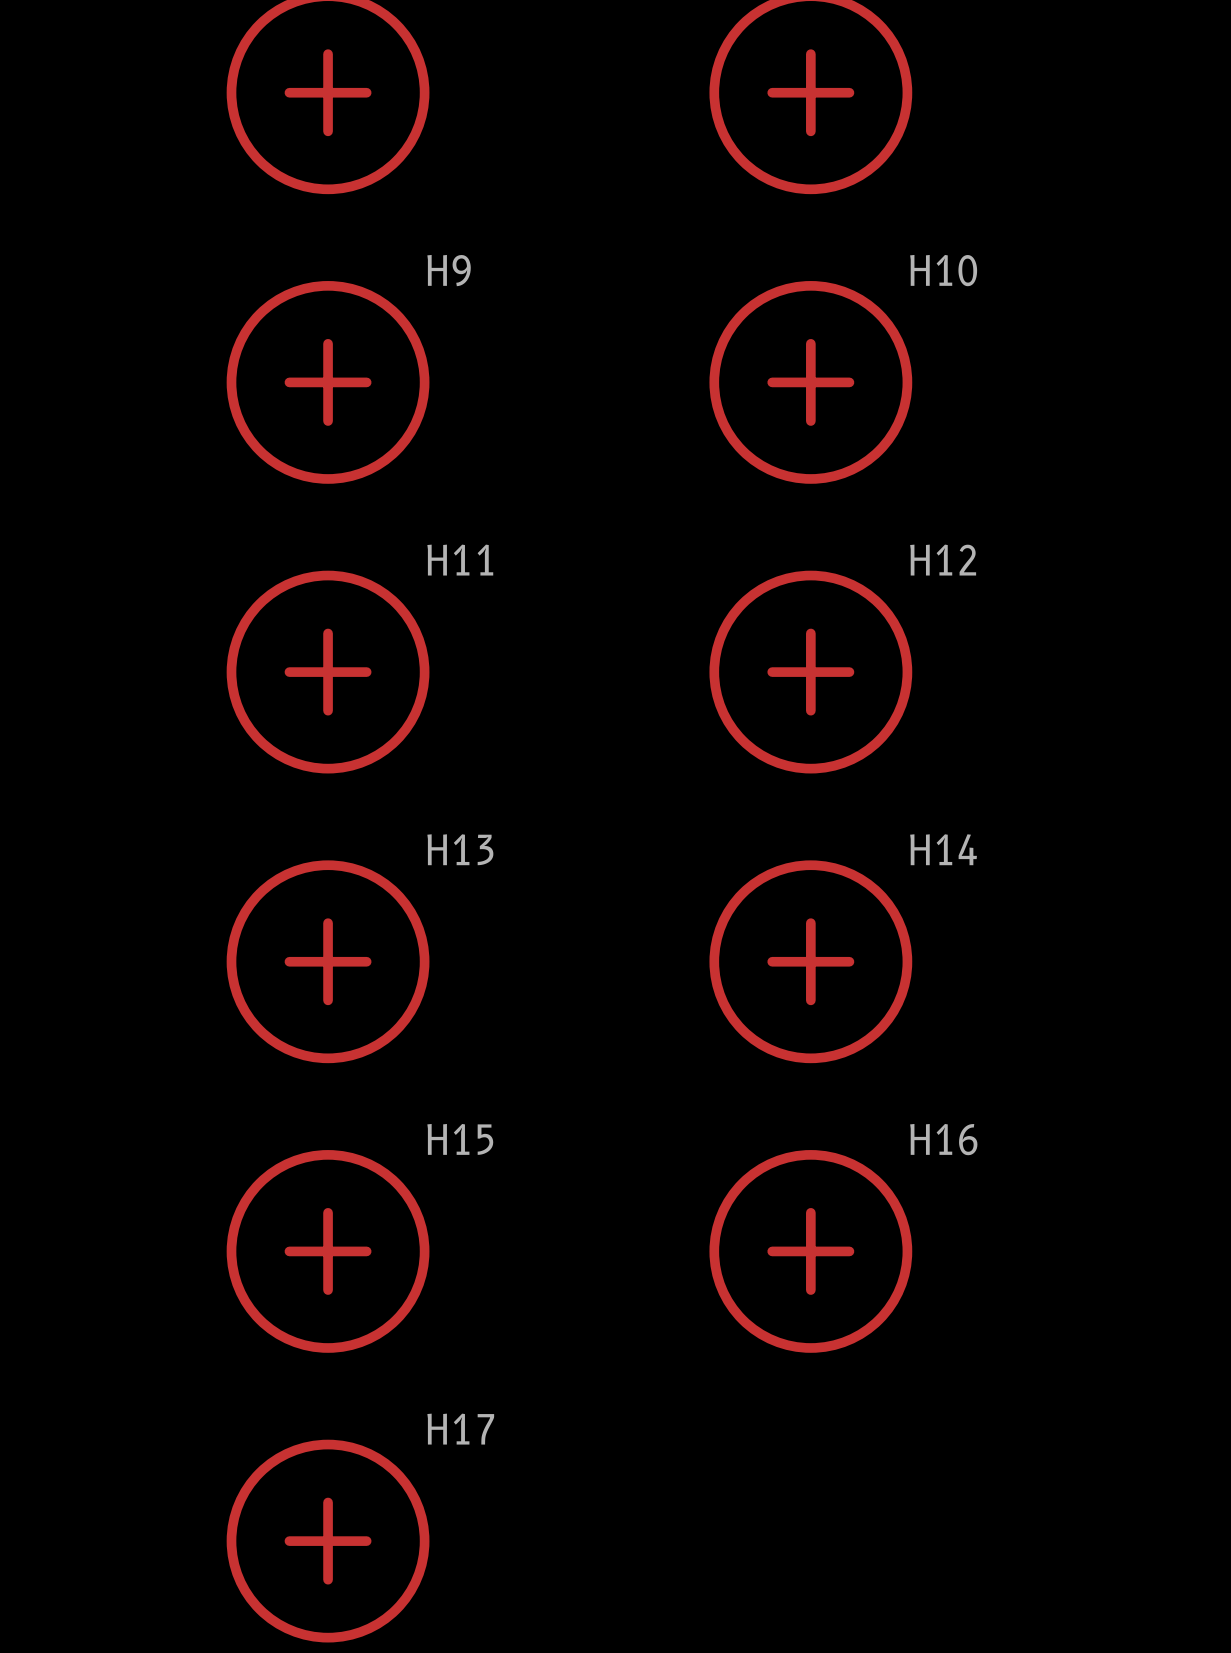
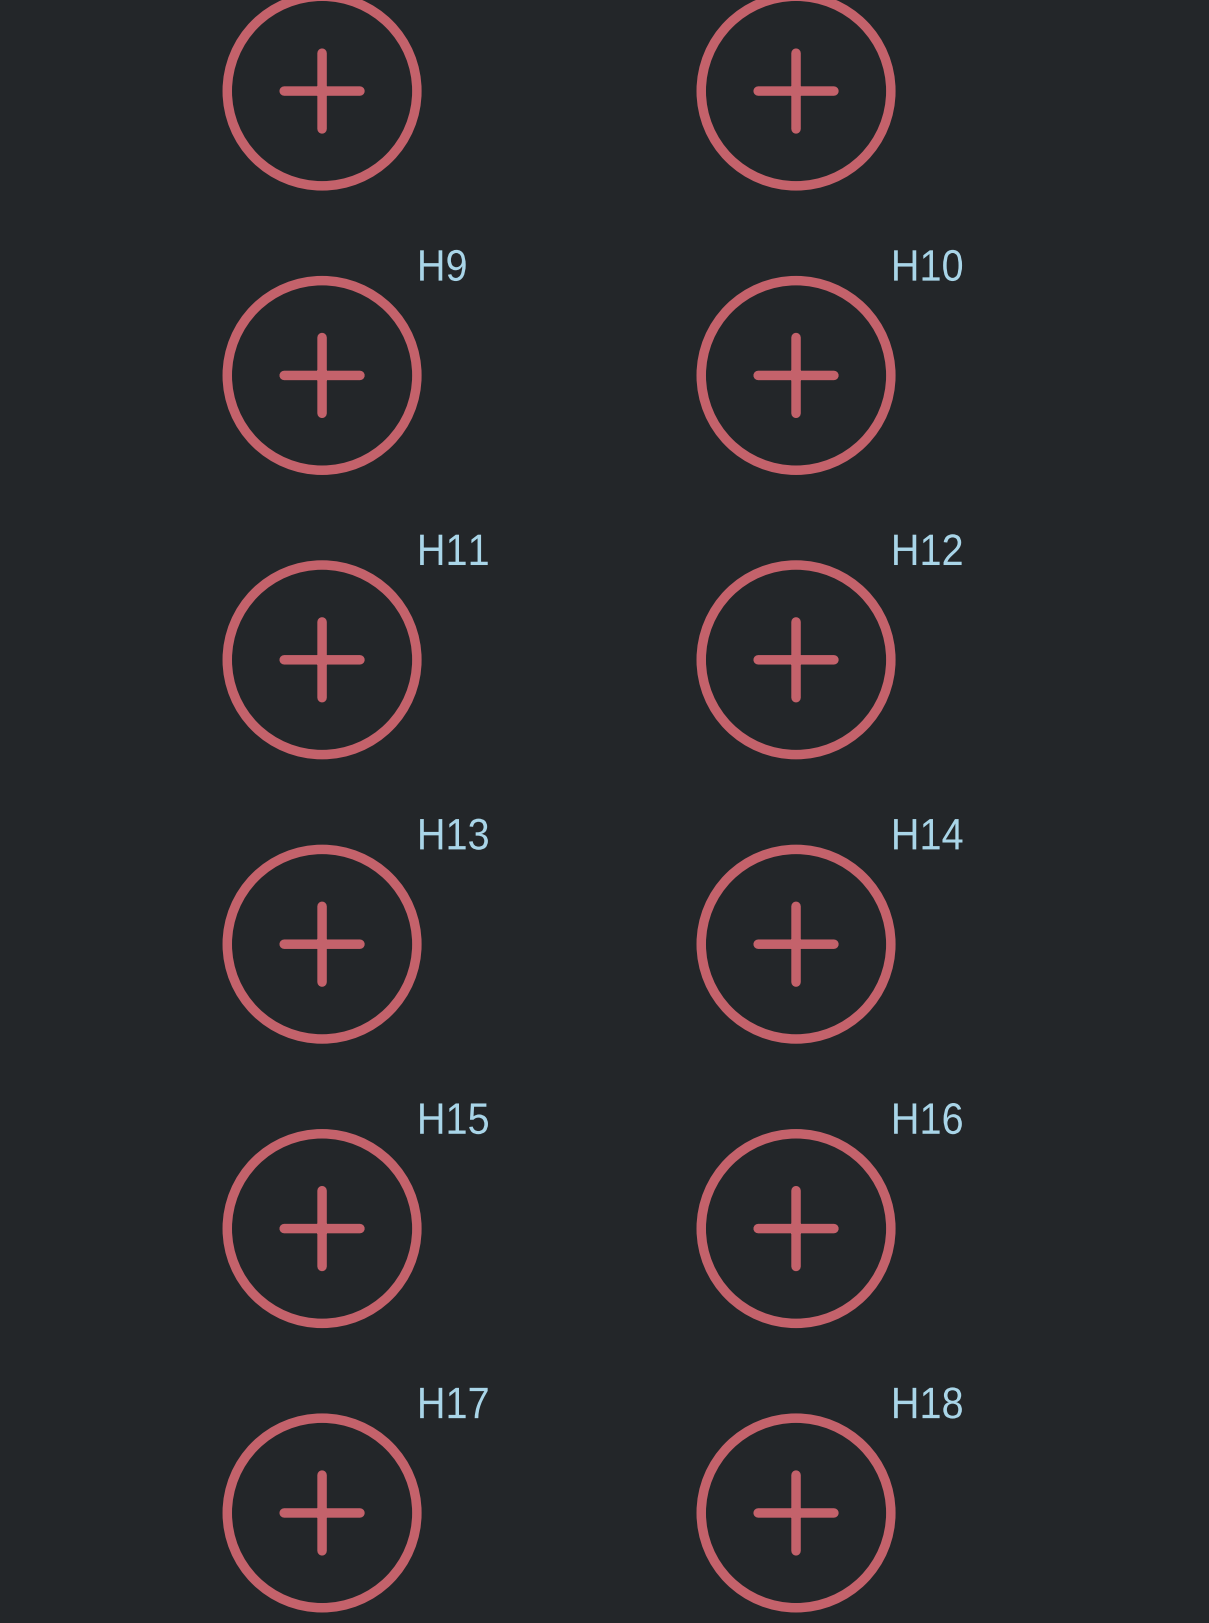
H18: none -> (796, 1512)

